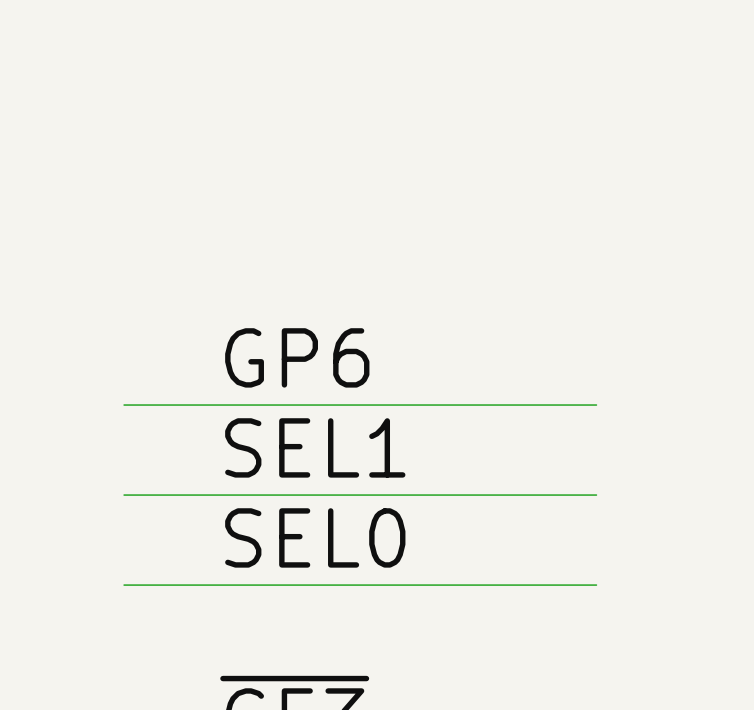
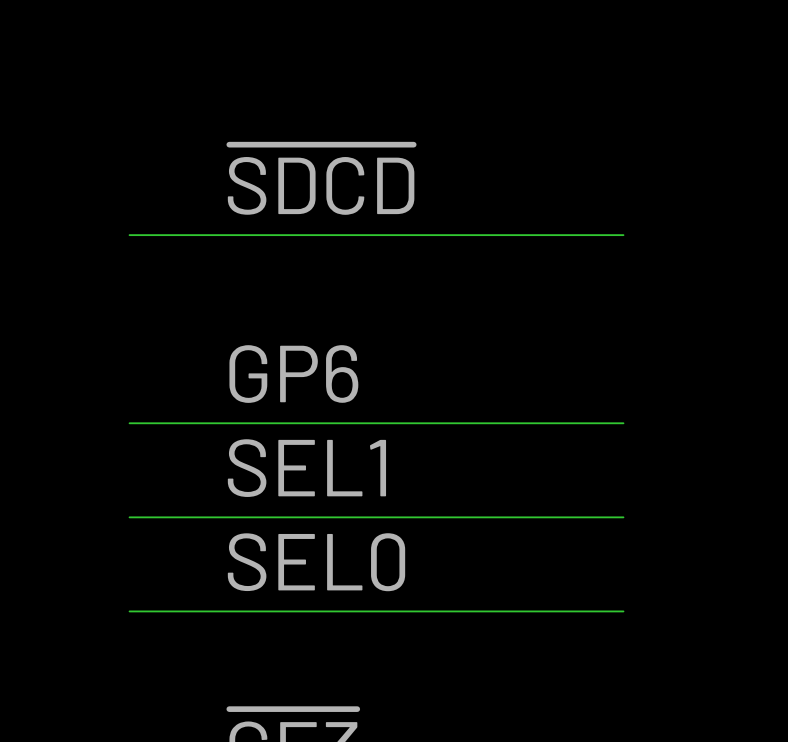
label: none -> ~{SDCD} (321, 179)
wire: none -> (129, 235) (623, 235)

